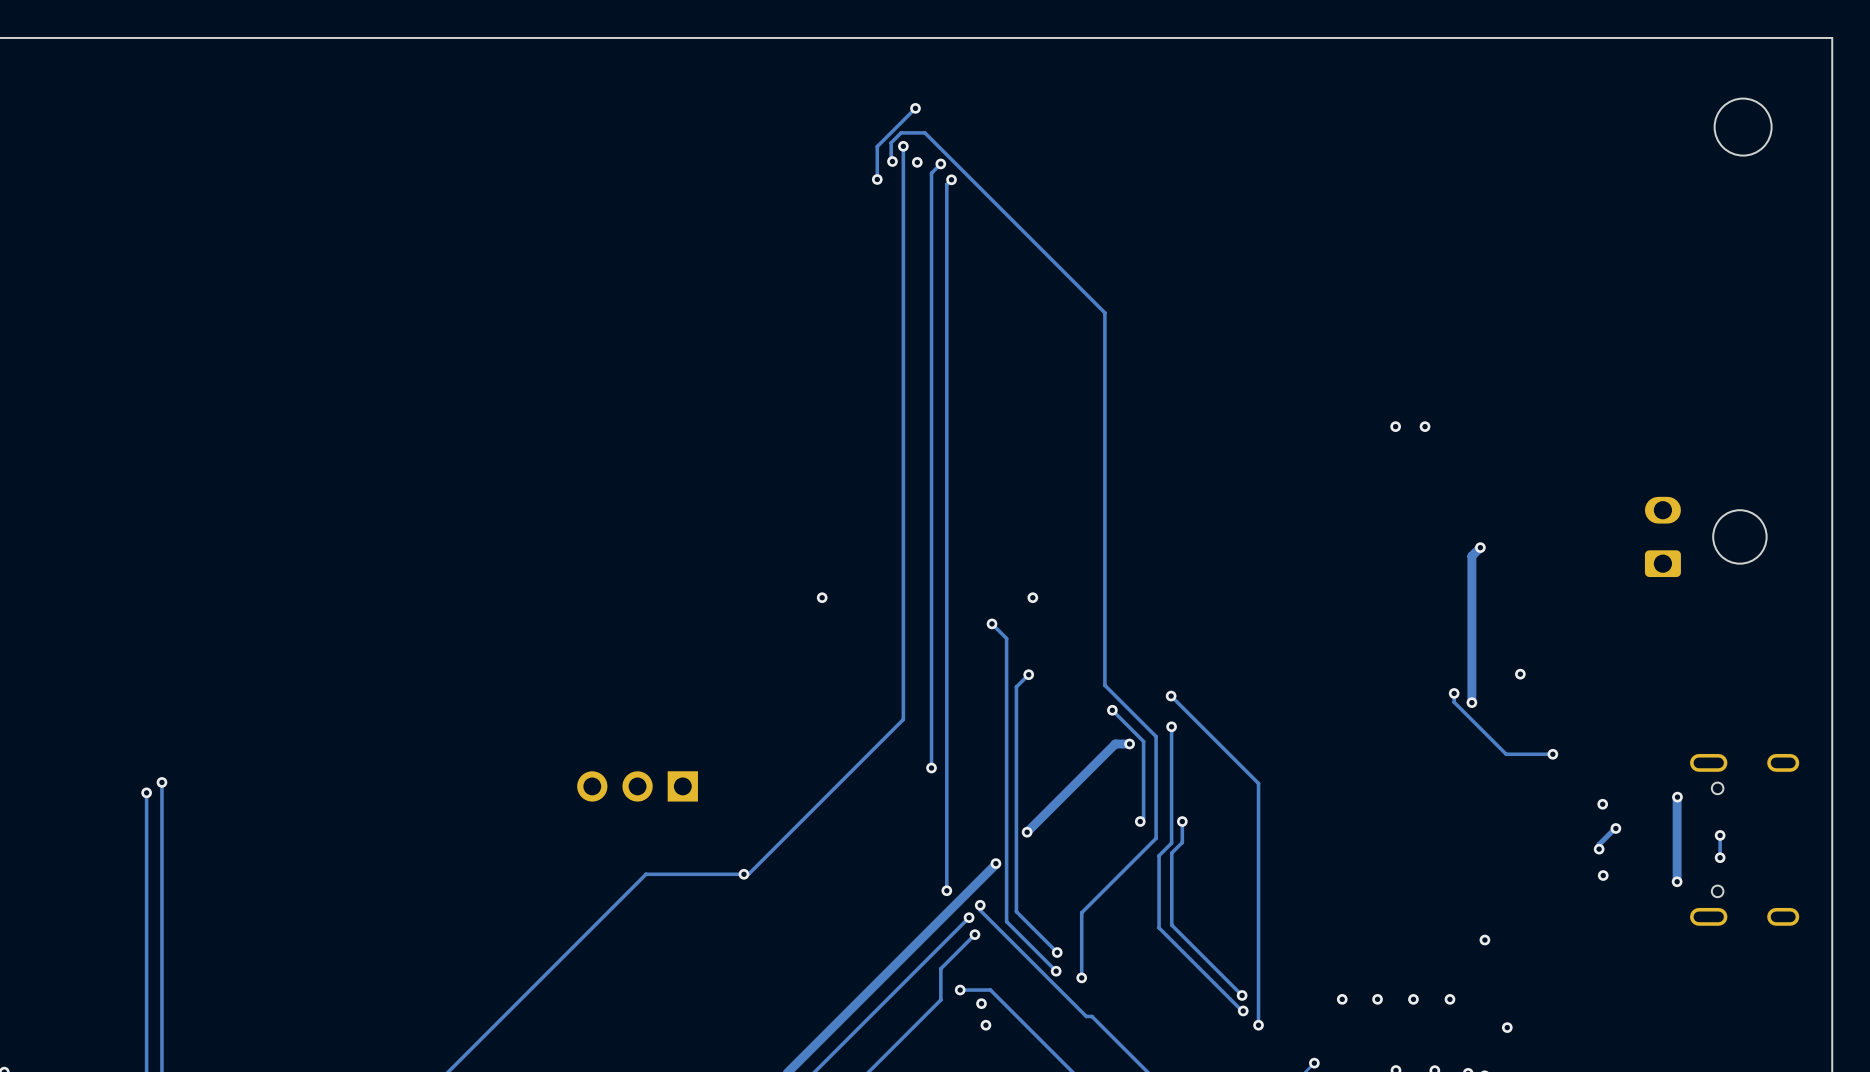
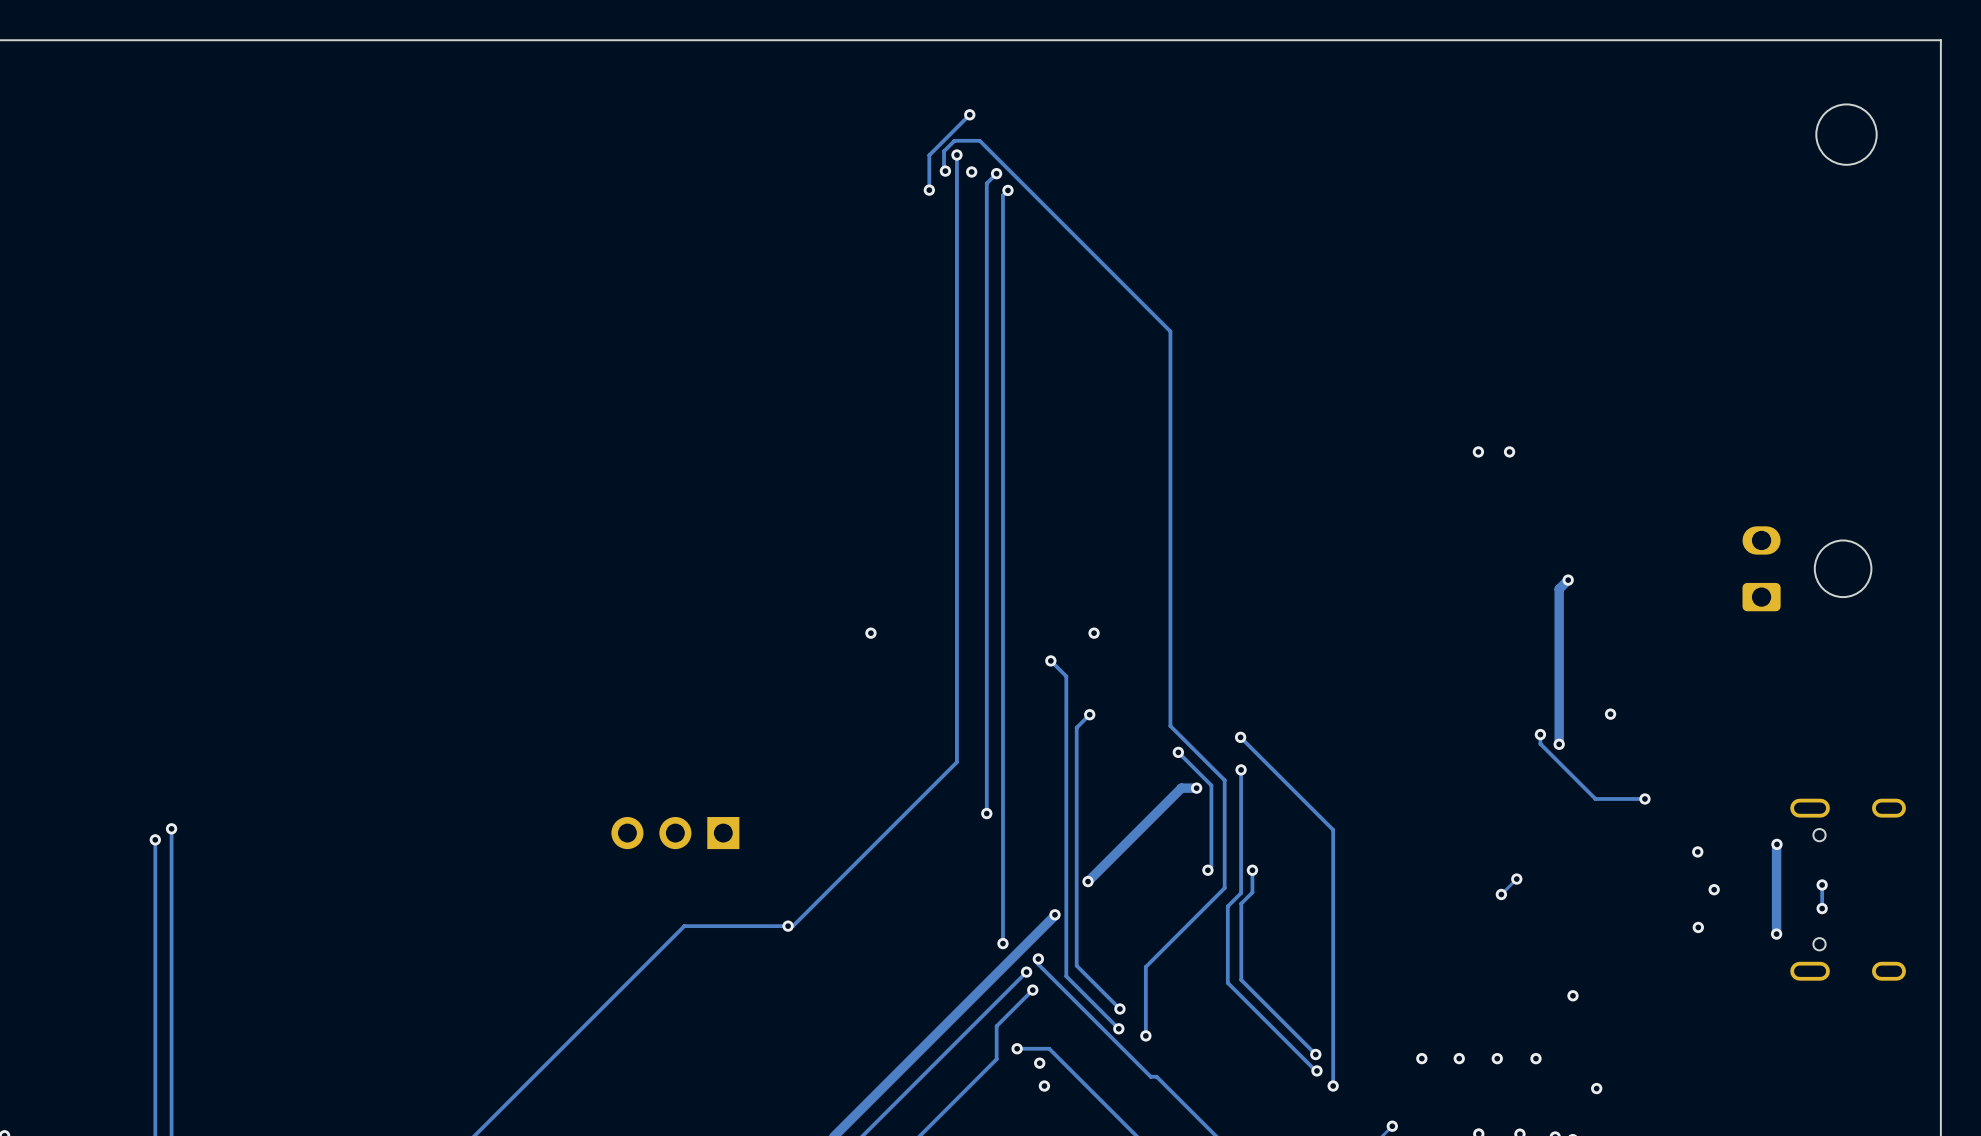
track: (1615, 828) (1599, 844) (1599, 849) -> none
via: (1615, 828) -> none
track: none -> (1516, 879) (1501, 894)
via: none -> (1516, 879)
via: none -> (1714, 889)
via: none -> (1501, 894)
via: (1599, 849) -> none

